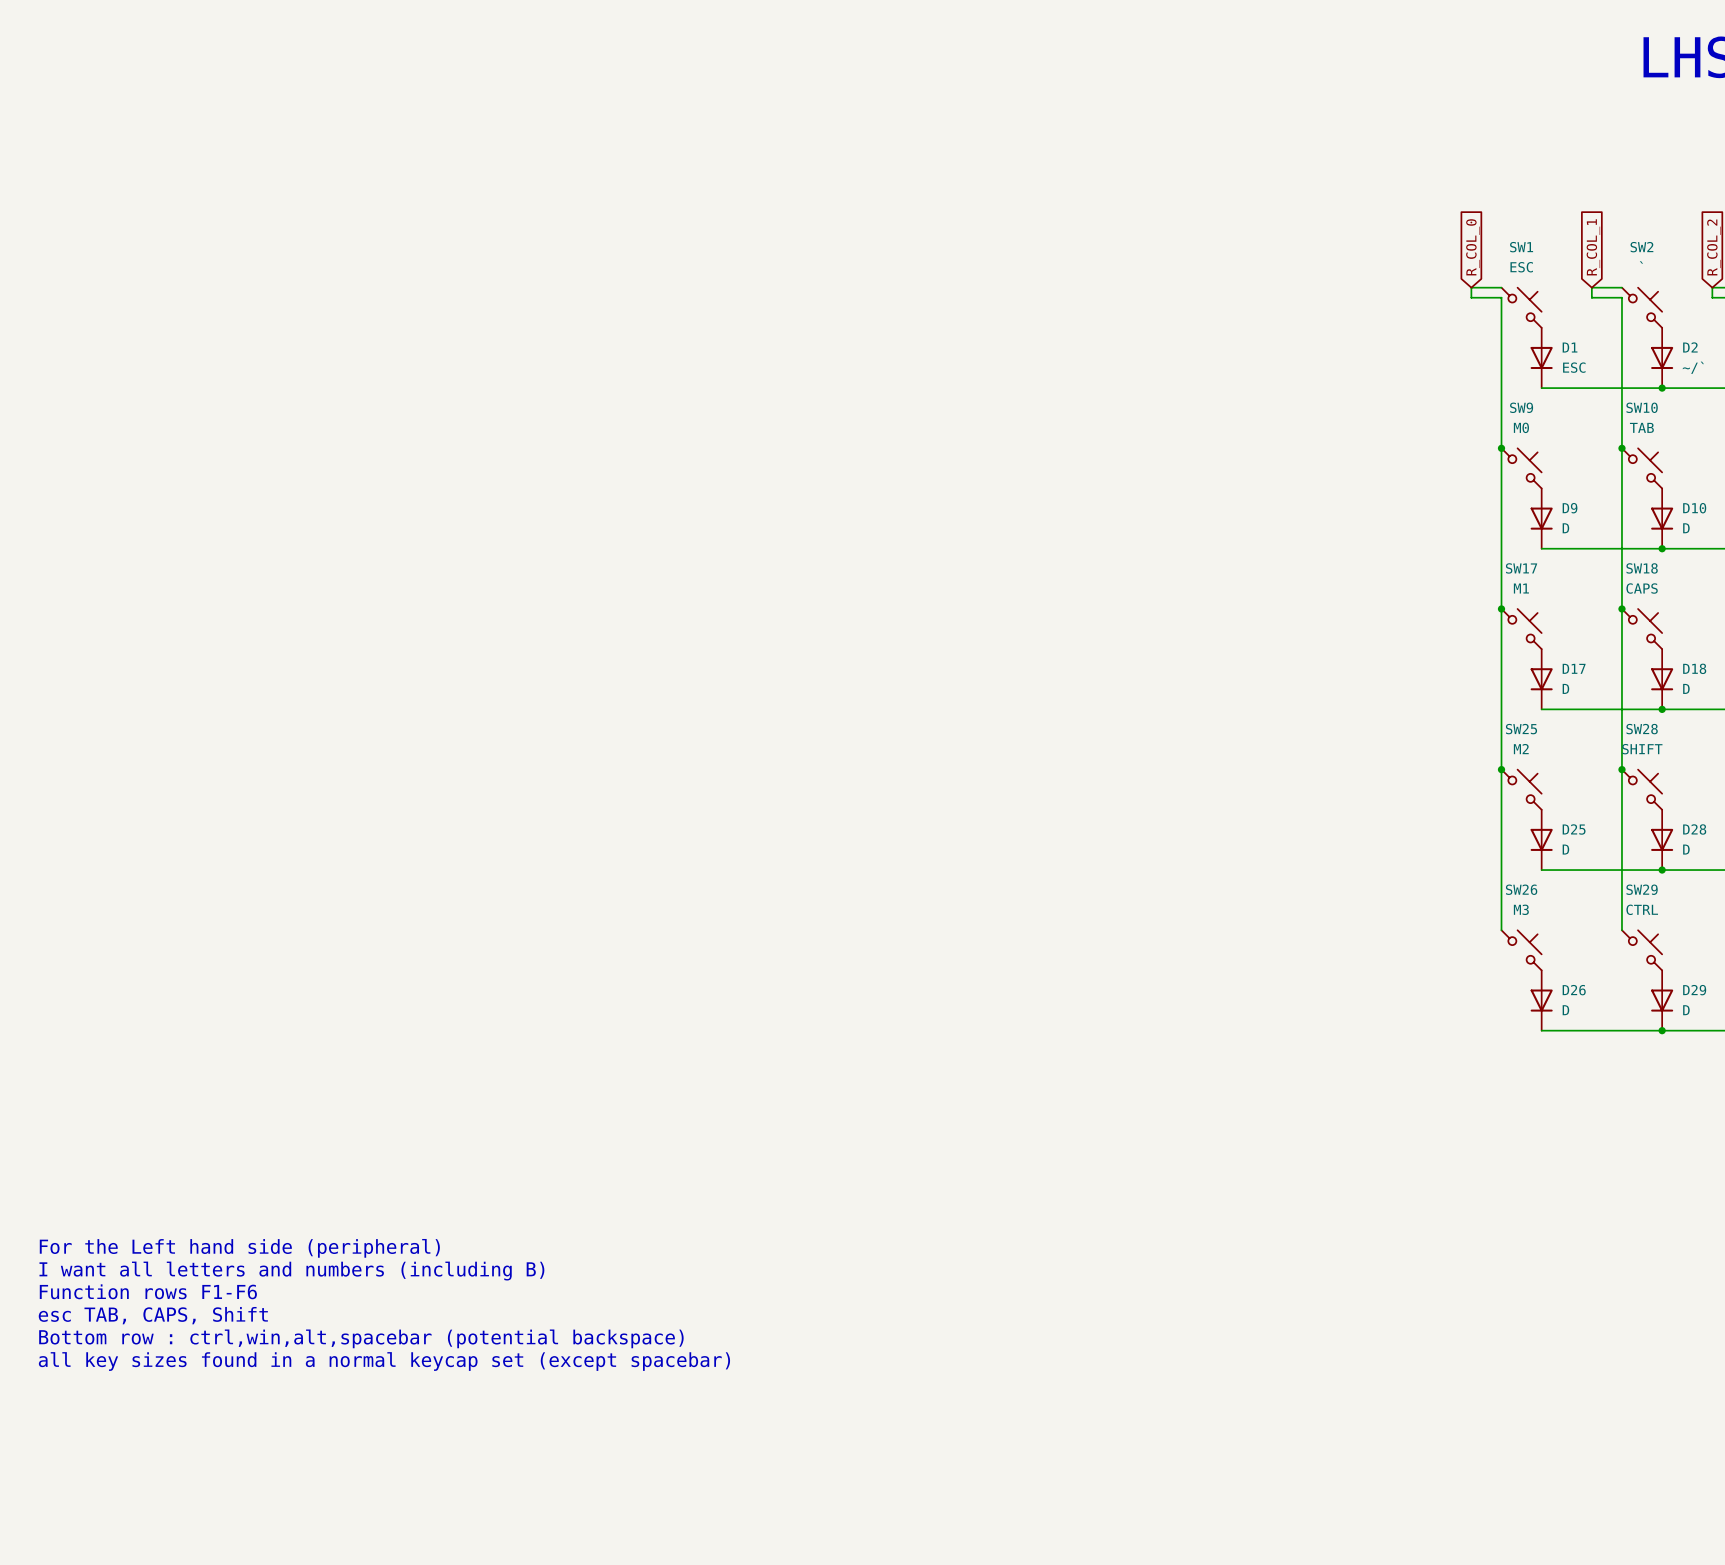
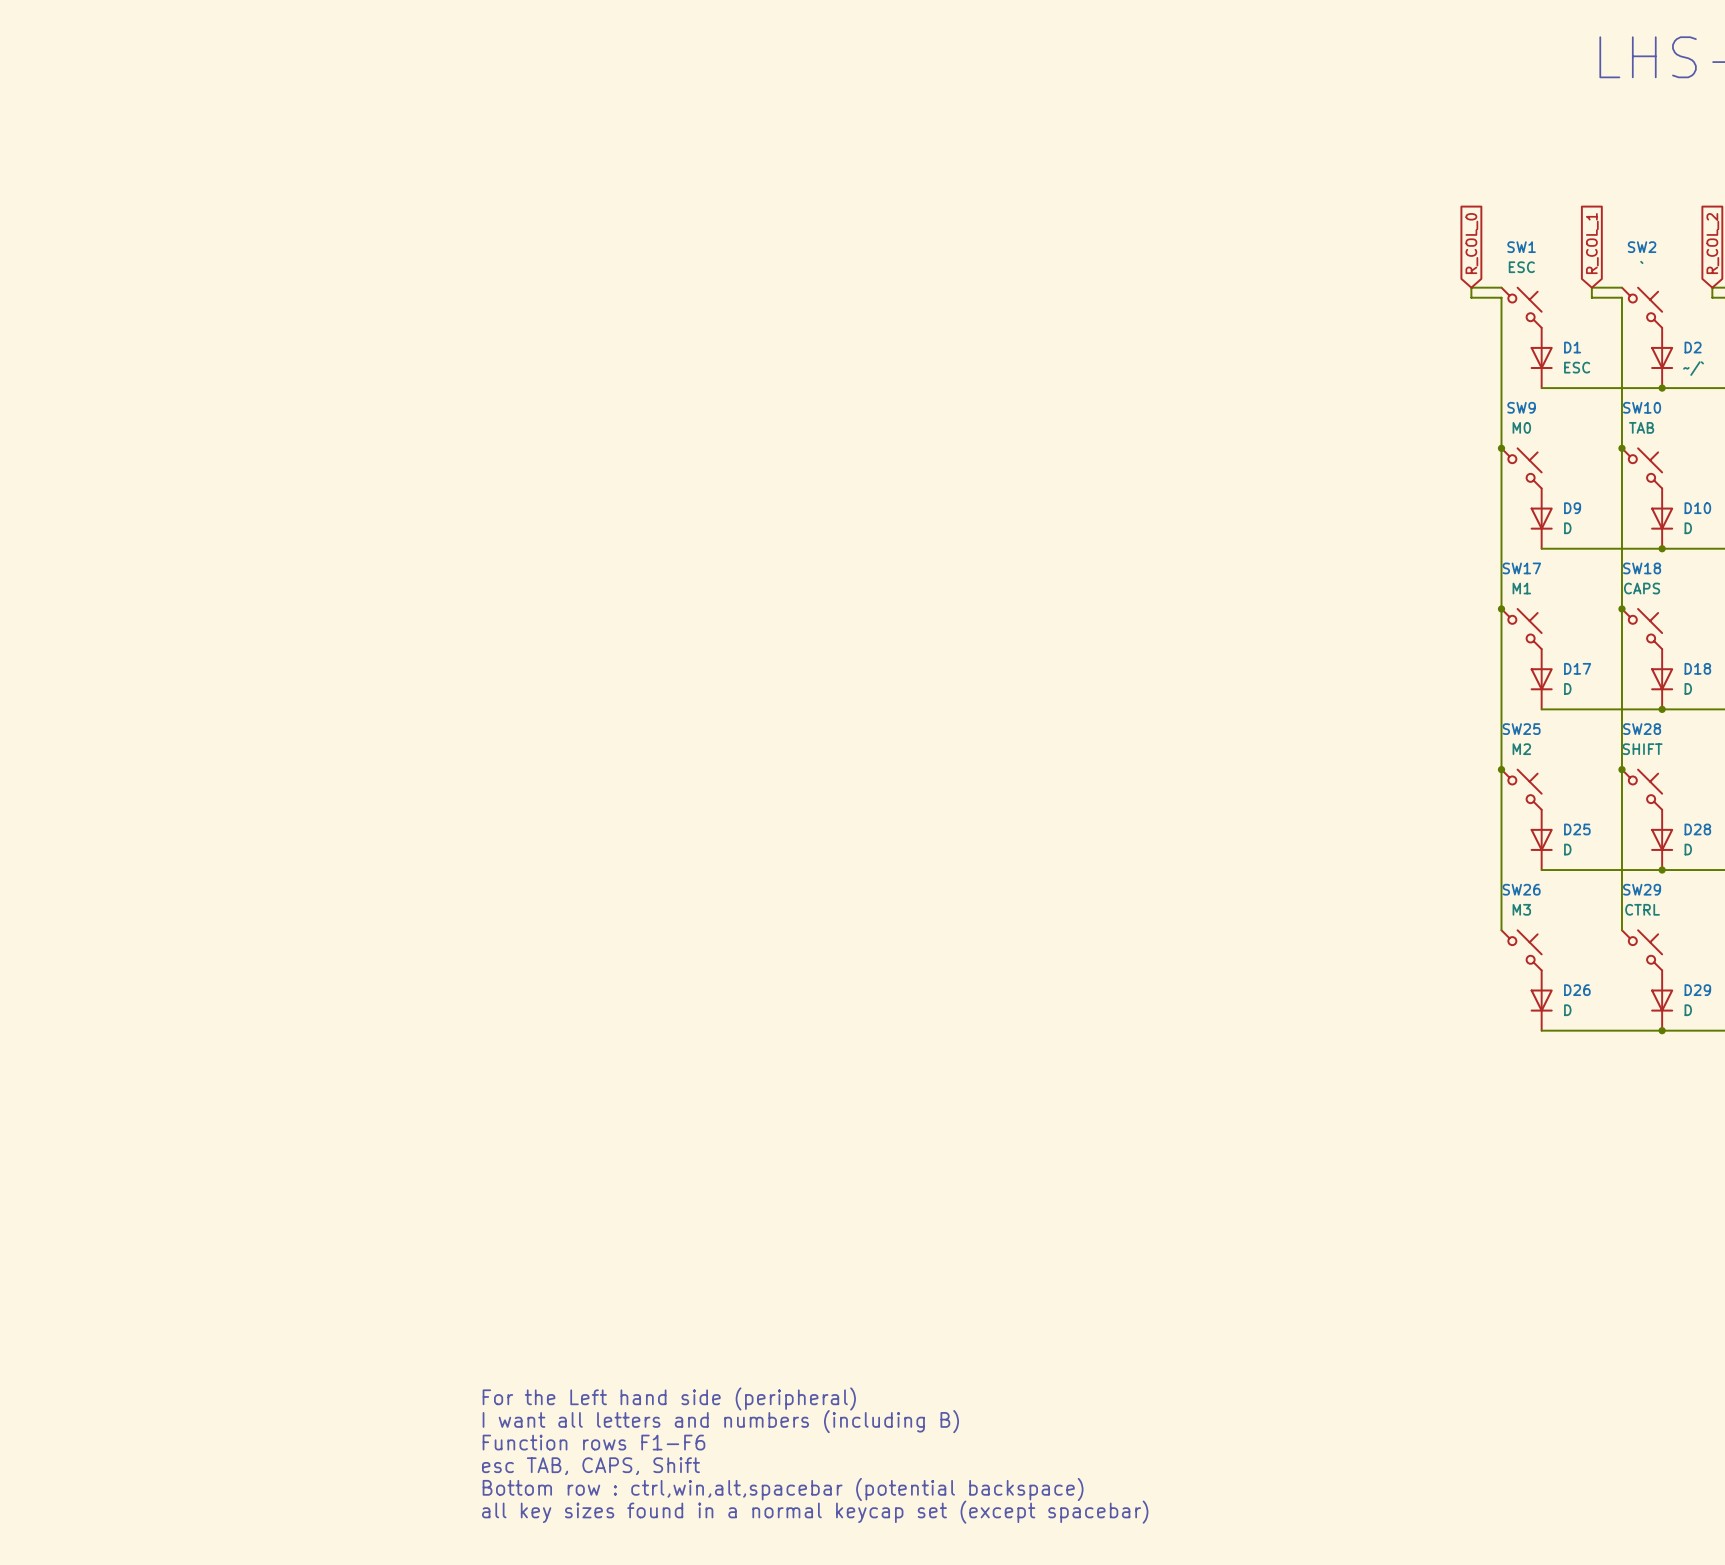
text: For the Left hand side (peripheral) (239, 1248) -> none
text: I want all letters and numbers (including B) (291, 1271) -> none
text: Function rows F1-F6 (148, 1291) -> none
text: esc TAB, CAPS, Shift (153, 1315) -> none
text: Bottom row : ctrl,win,alt,spacebar (potential backspace) (361, 1338) -> none
text: all key sizes found in a normal keycap set (except spacebar) (384, 1361) -> none
text: none -> For the Left hand side (peripheral) (669, 1398)
text: none -> I want all letters and numbers (including B) (720, 1421)
text: none -> Function rows F1-F6 (593, 1442)
text: none -> esc TAB, CAPS, Shift (590, 1466)
text: none -> Bottom row : ctrl,win,alt,spacebar (potential backspace) (783, 1489)
text: none -> all key sizes found in a normal keycap set (except spacebar) (815, 1512)

